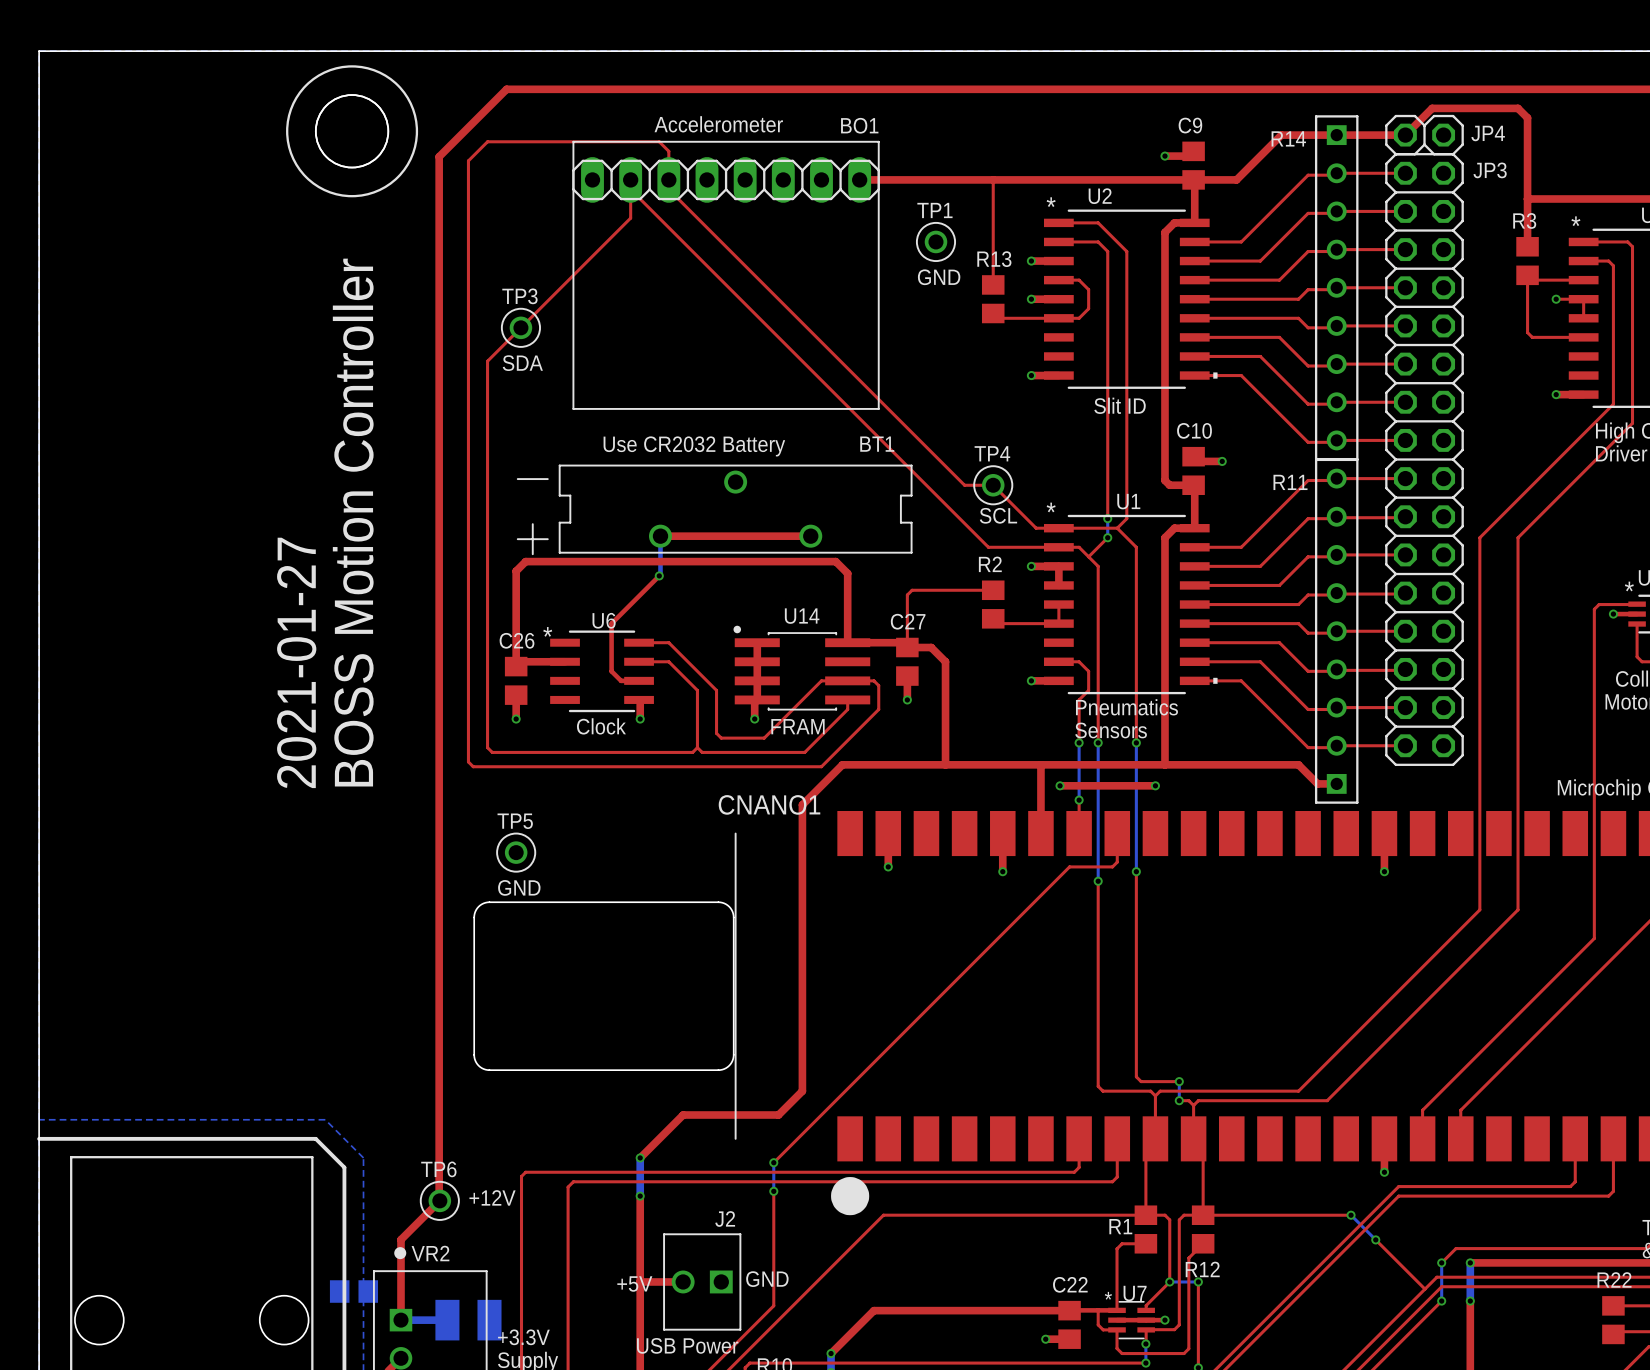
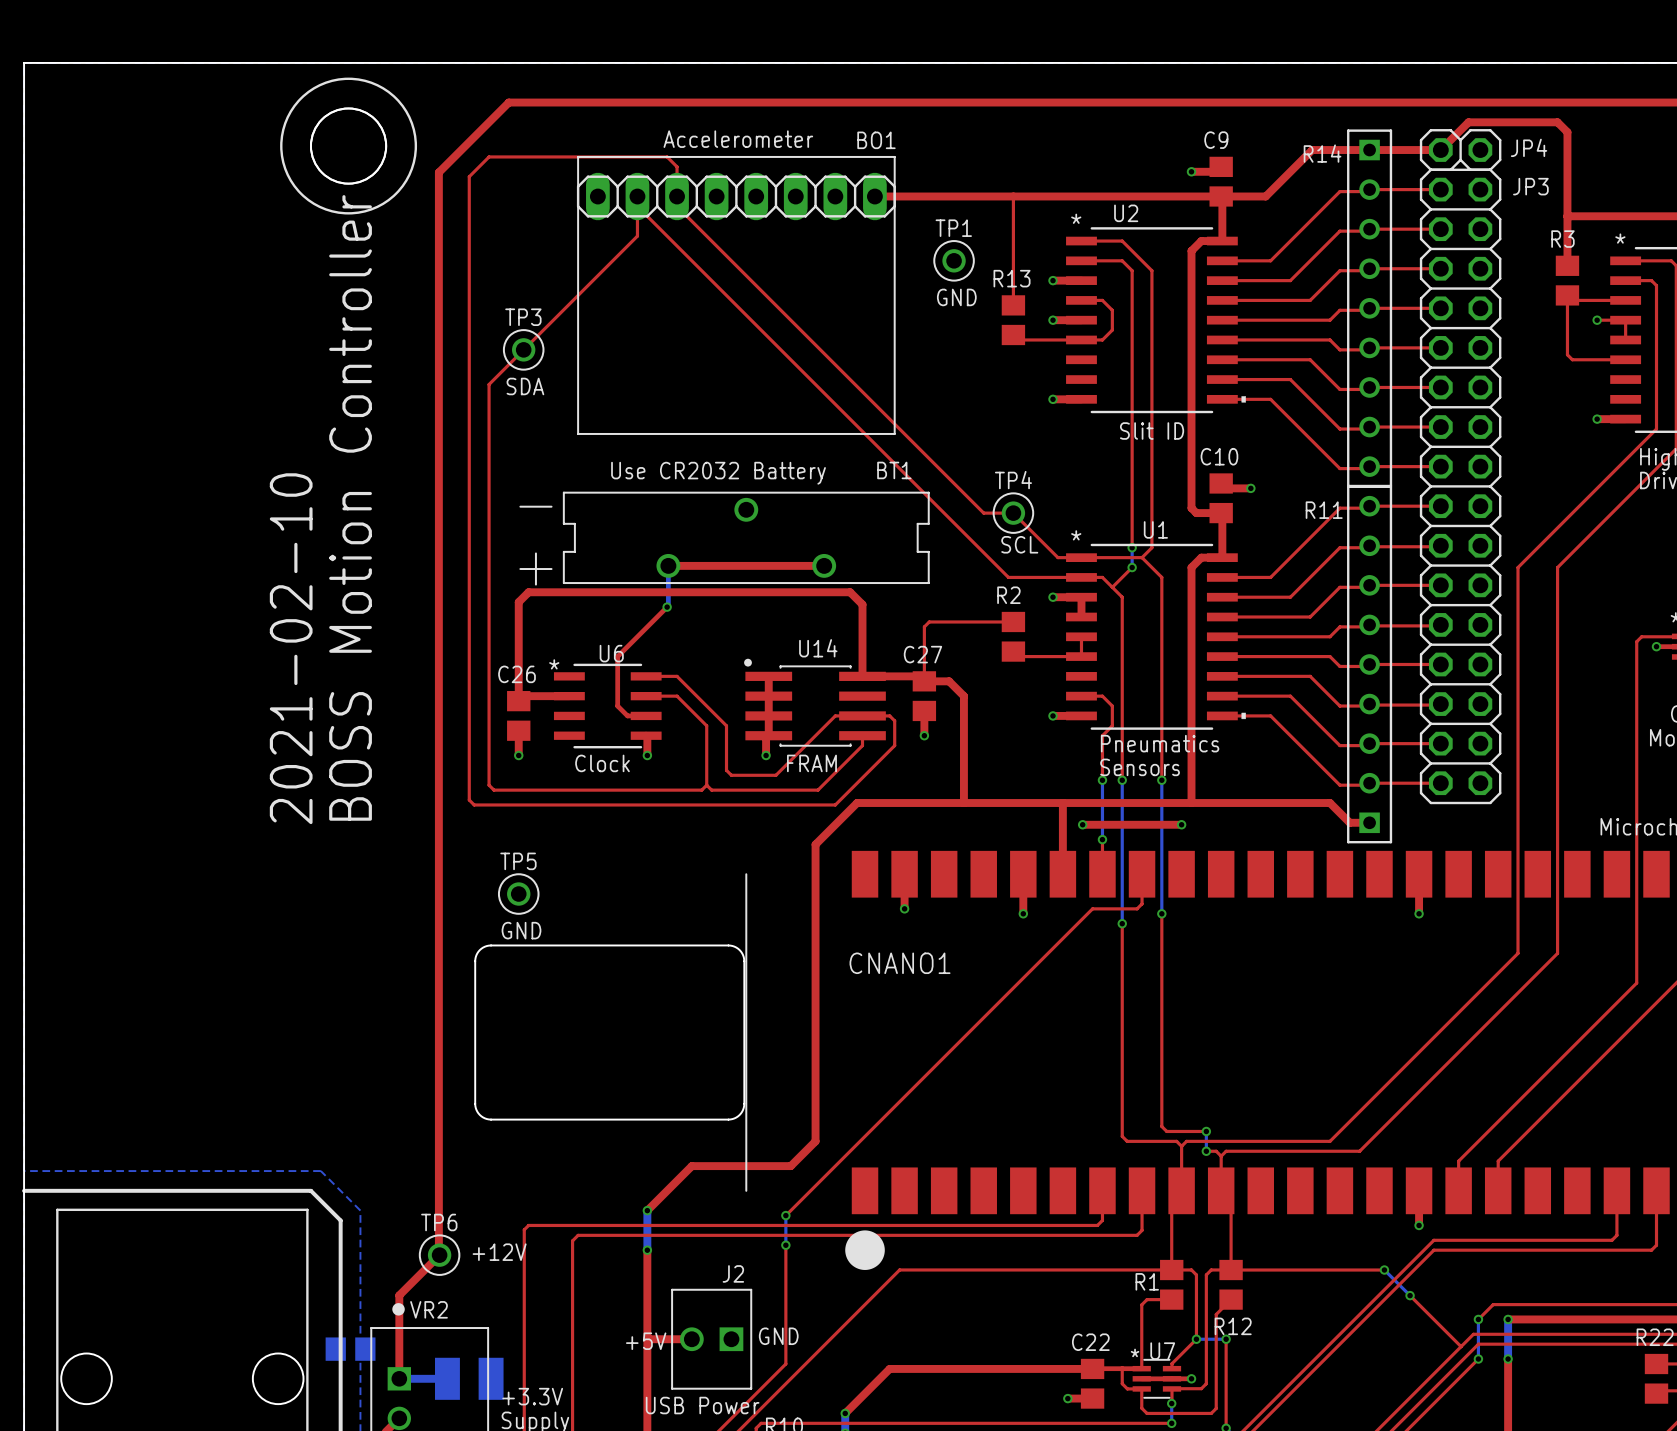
text: 2021-01-27 (296, 662) -> 2021-02-10 (291, 648)
CNANO1 name position: CNANO1 (769, 804) -> CNANO1 (900, 963)

